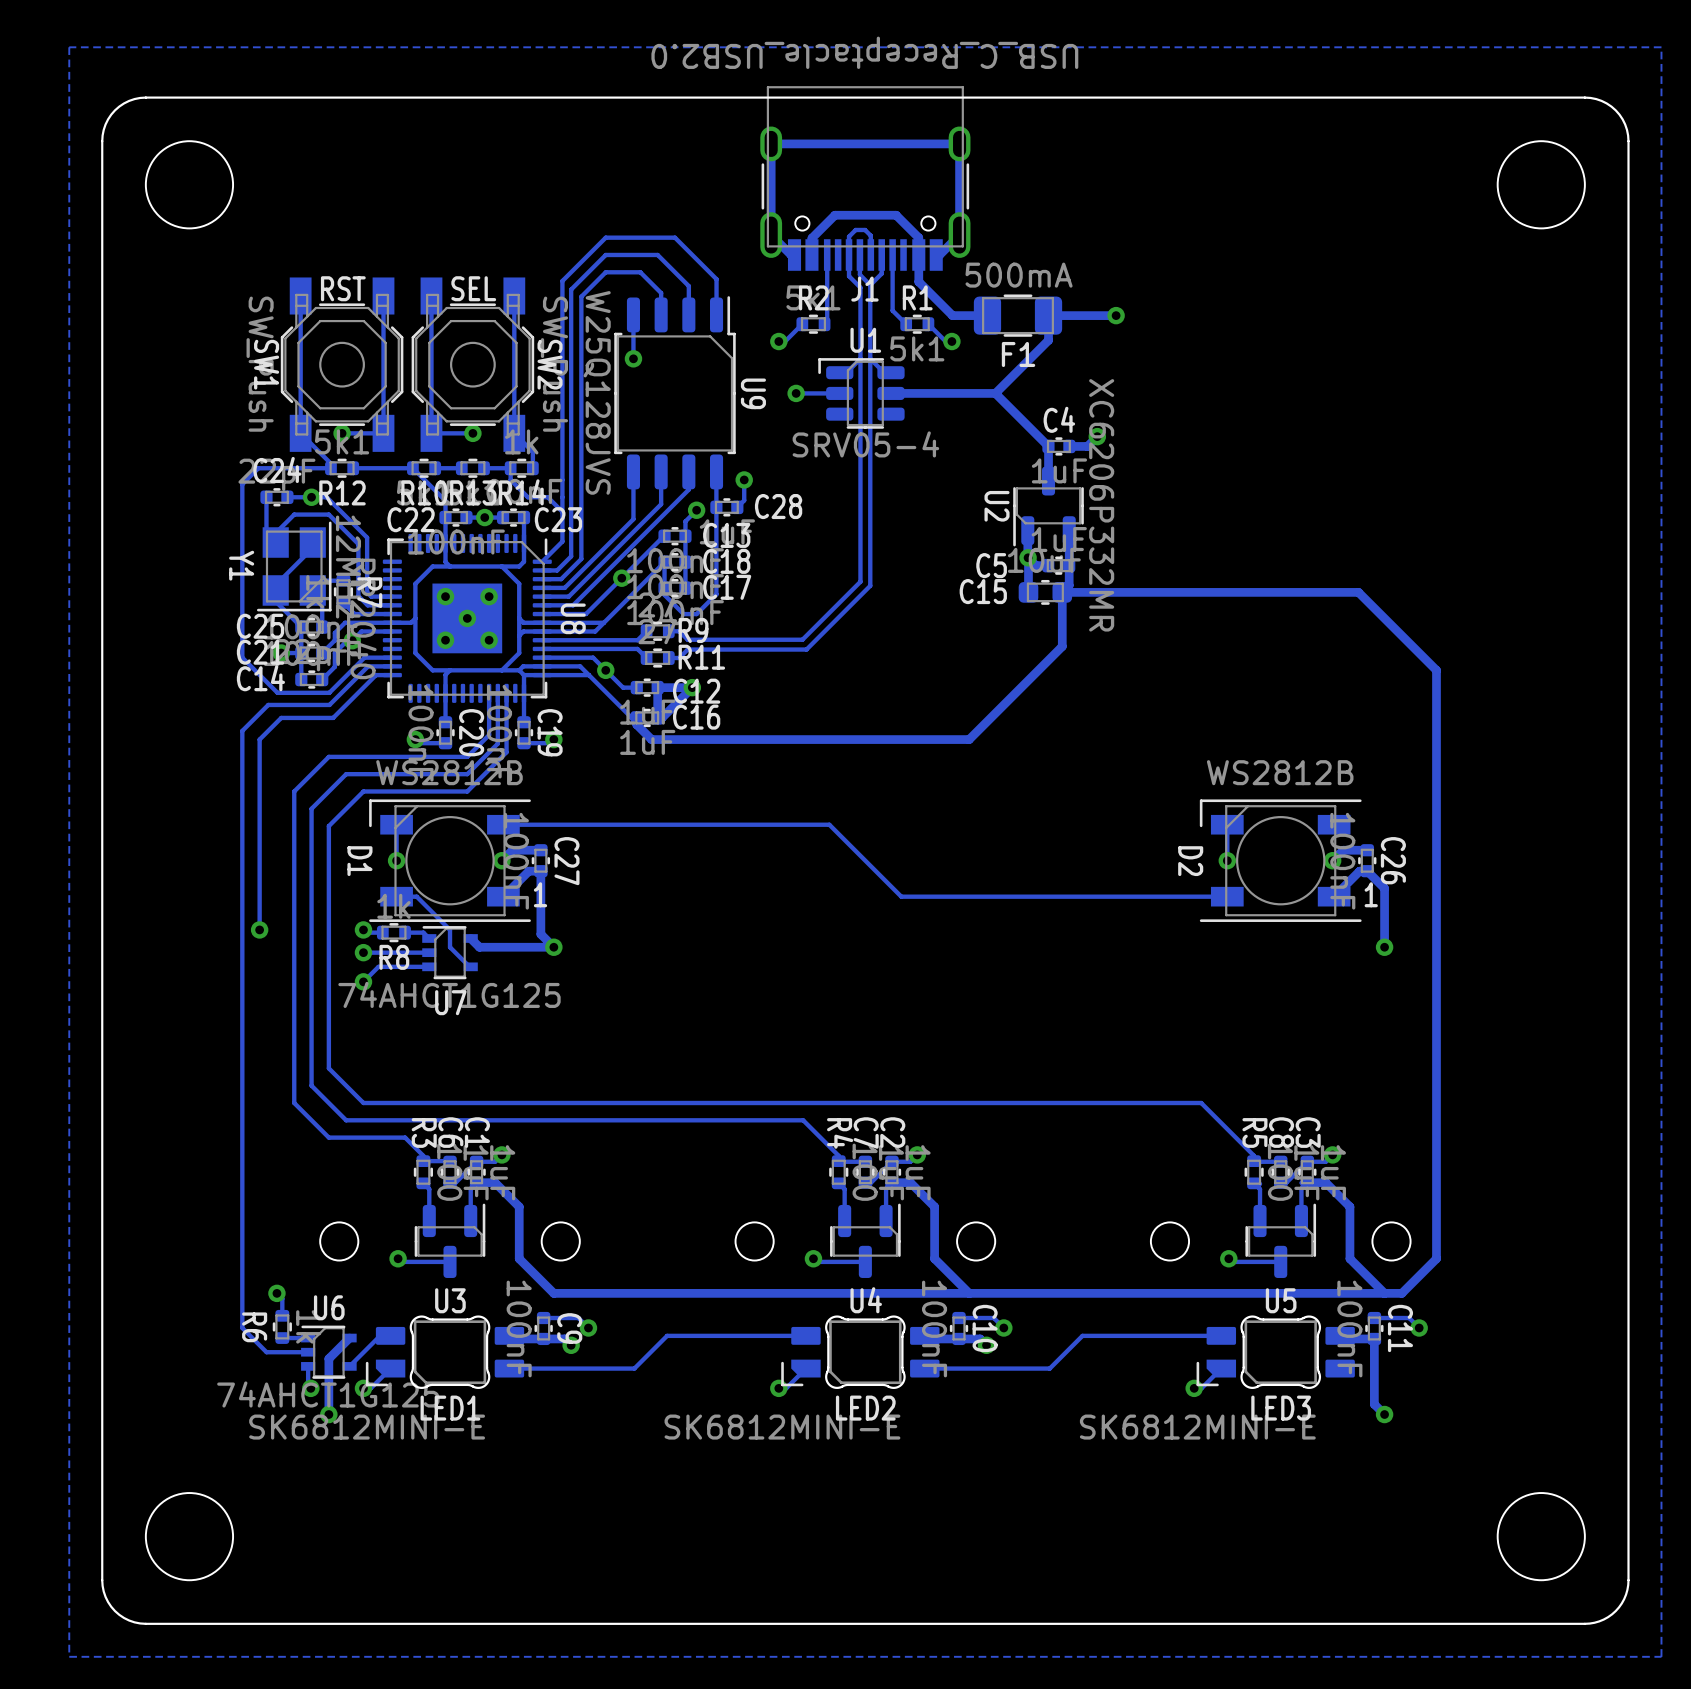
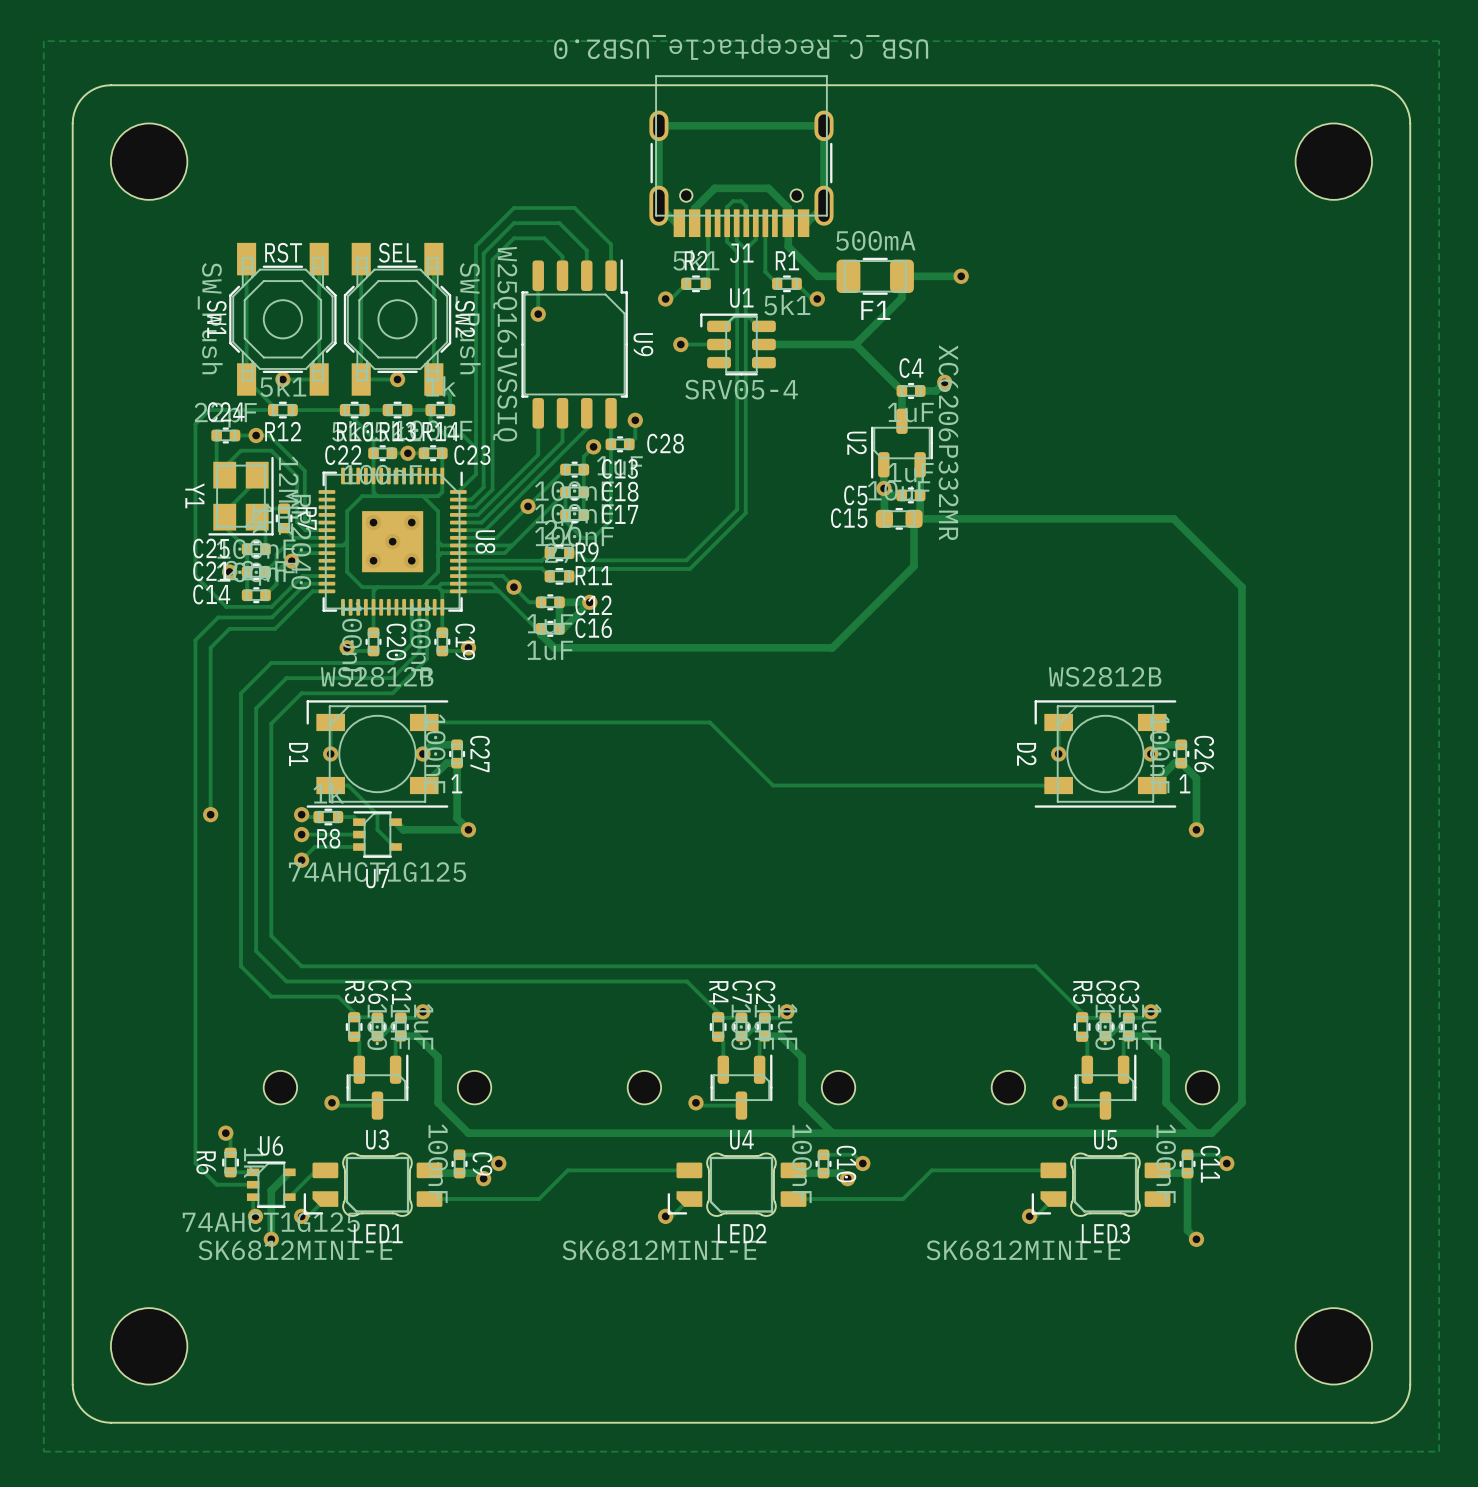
U9 value: W25Q128JVS (597, 392) -> W25Q16JVSSIQ (505, 344)

